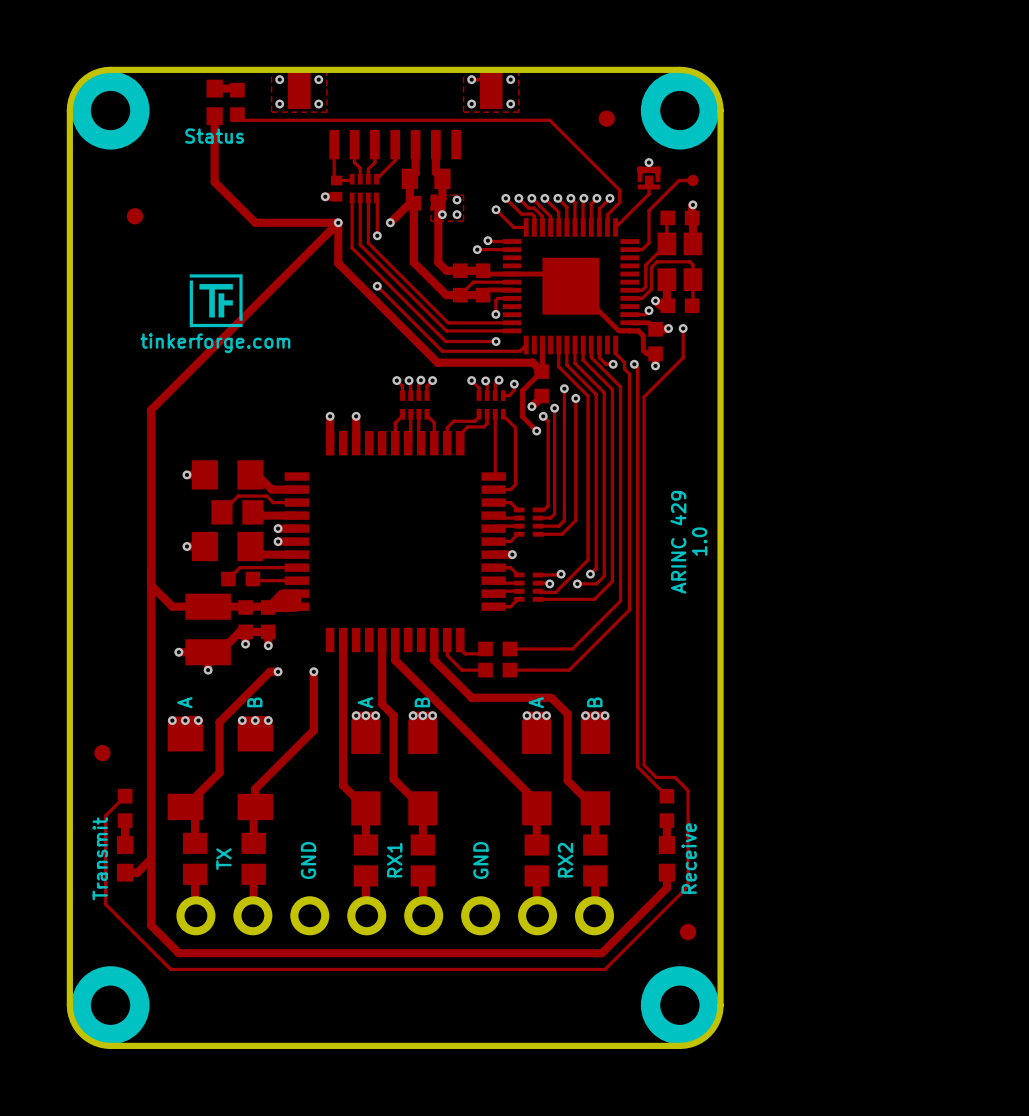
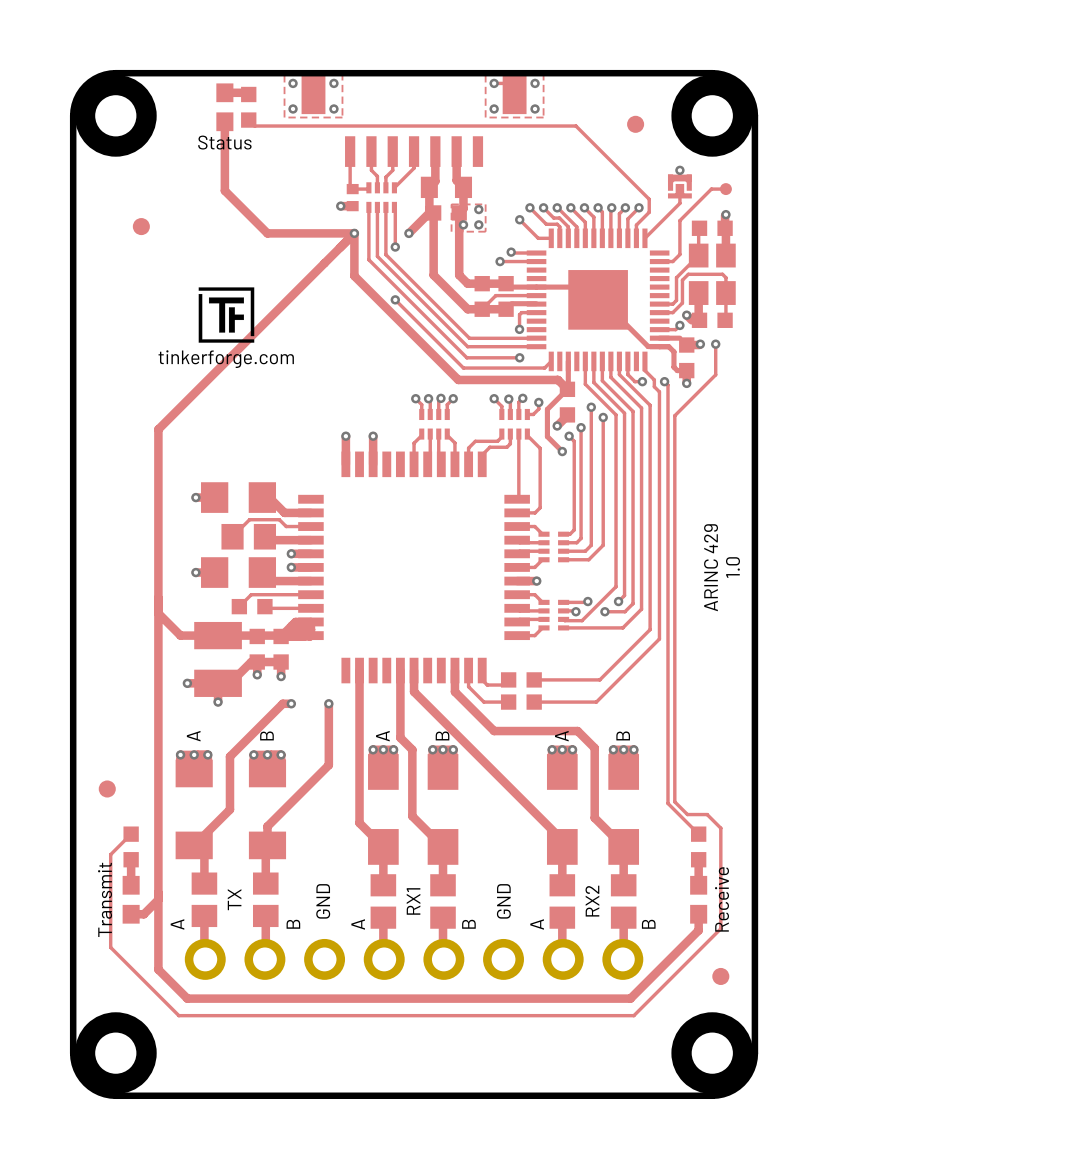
text: none -> A (177, 924)
text: none -> B (293, 924)
text: none -> A (358, 924)
text: none -> B (468, 924)
text: none -> A (537, 924)
text: none -> B (648, 924)

